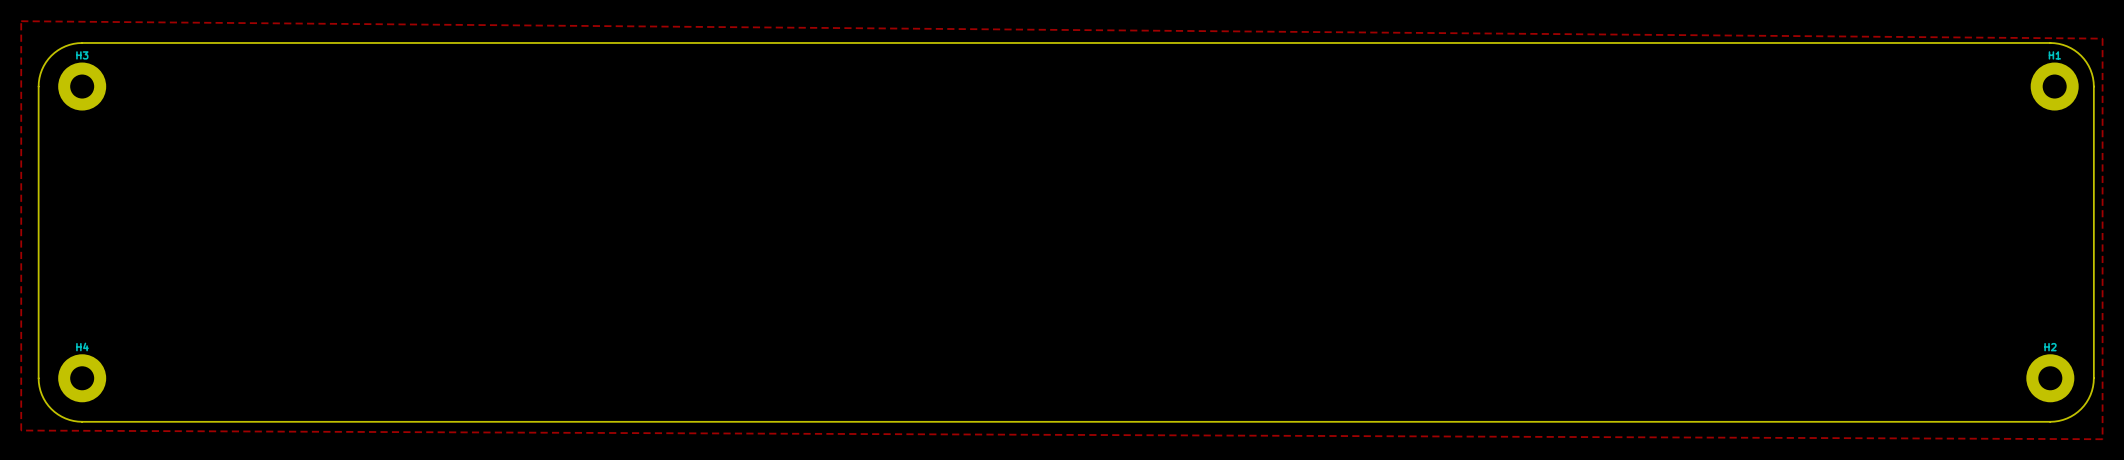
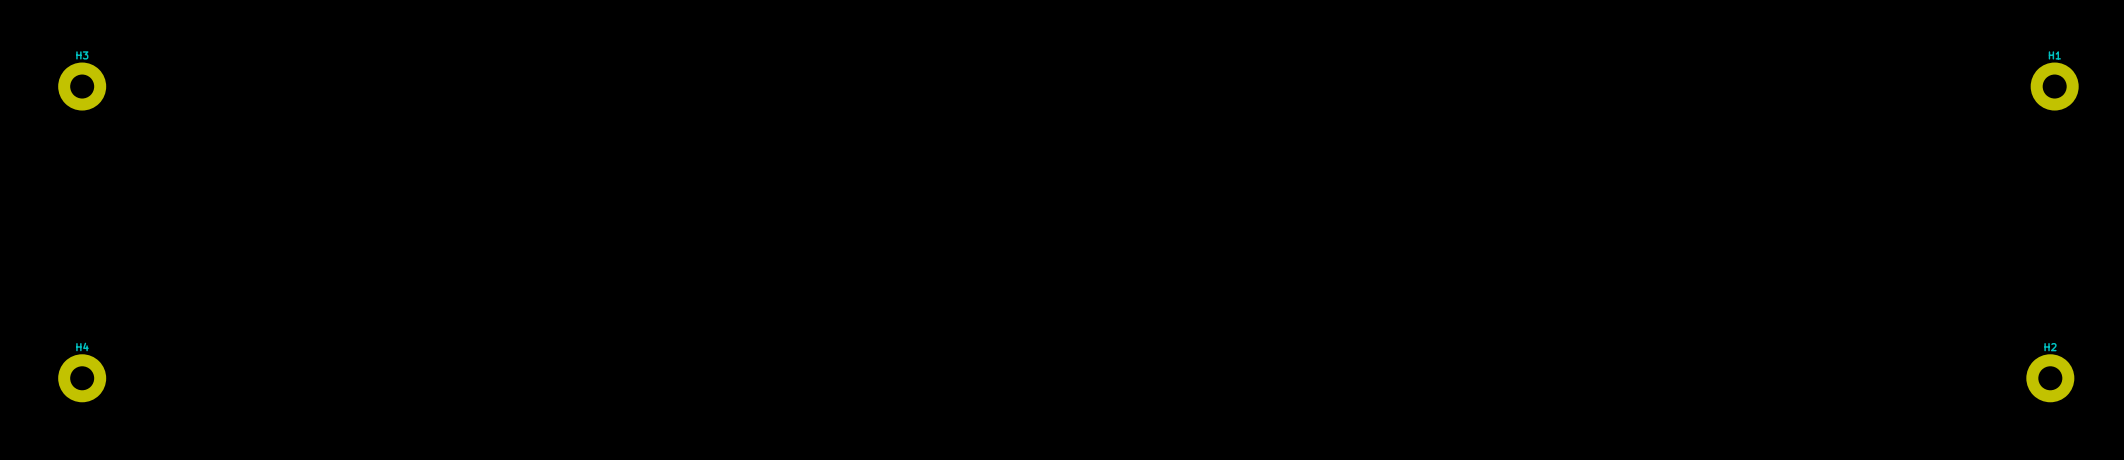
top zone outline: (21, 21) (21, 430) (2102, 439) (2102, 38) (21, 21) -> none
board edge: (82, 42) (2058, 43) (2070, 48) (2081, 55) (2090, 69) (2093, 82) (2093, 386) (2088, 398) (2077, 411) (2066, 418) (2050, 421) (73, 420) (61, 416) (48, 405) (41, 394) (38, 382) (38, 86) (41, 69) (51, 55) (65, 46) (82, 42) -> none

